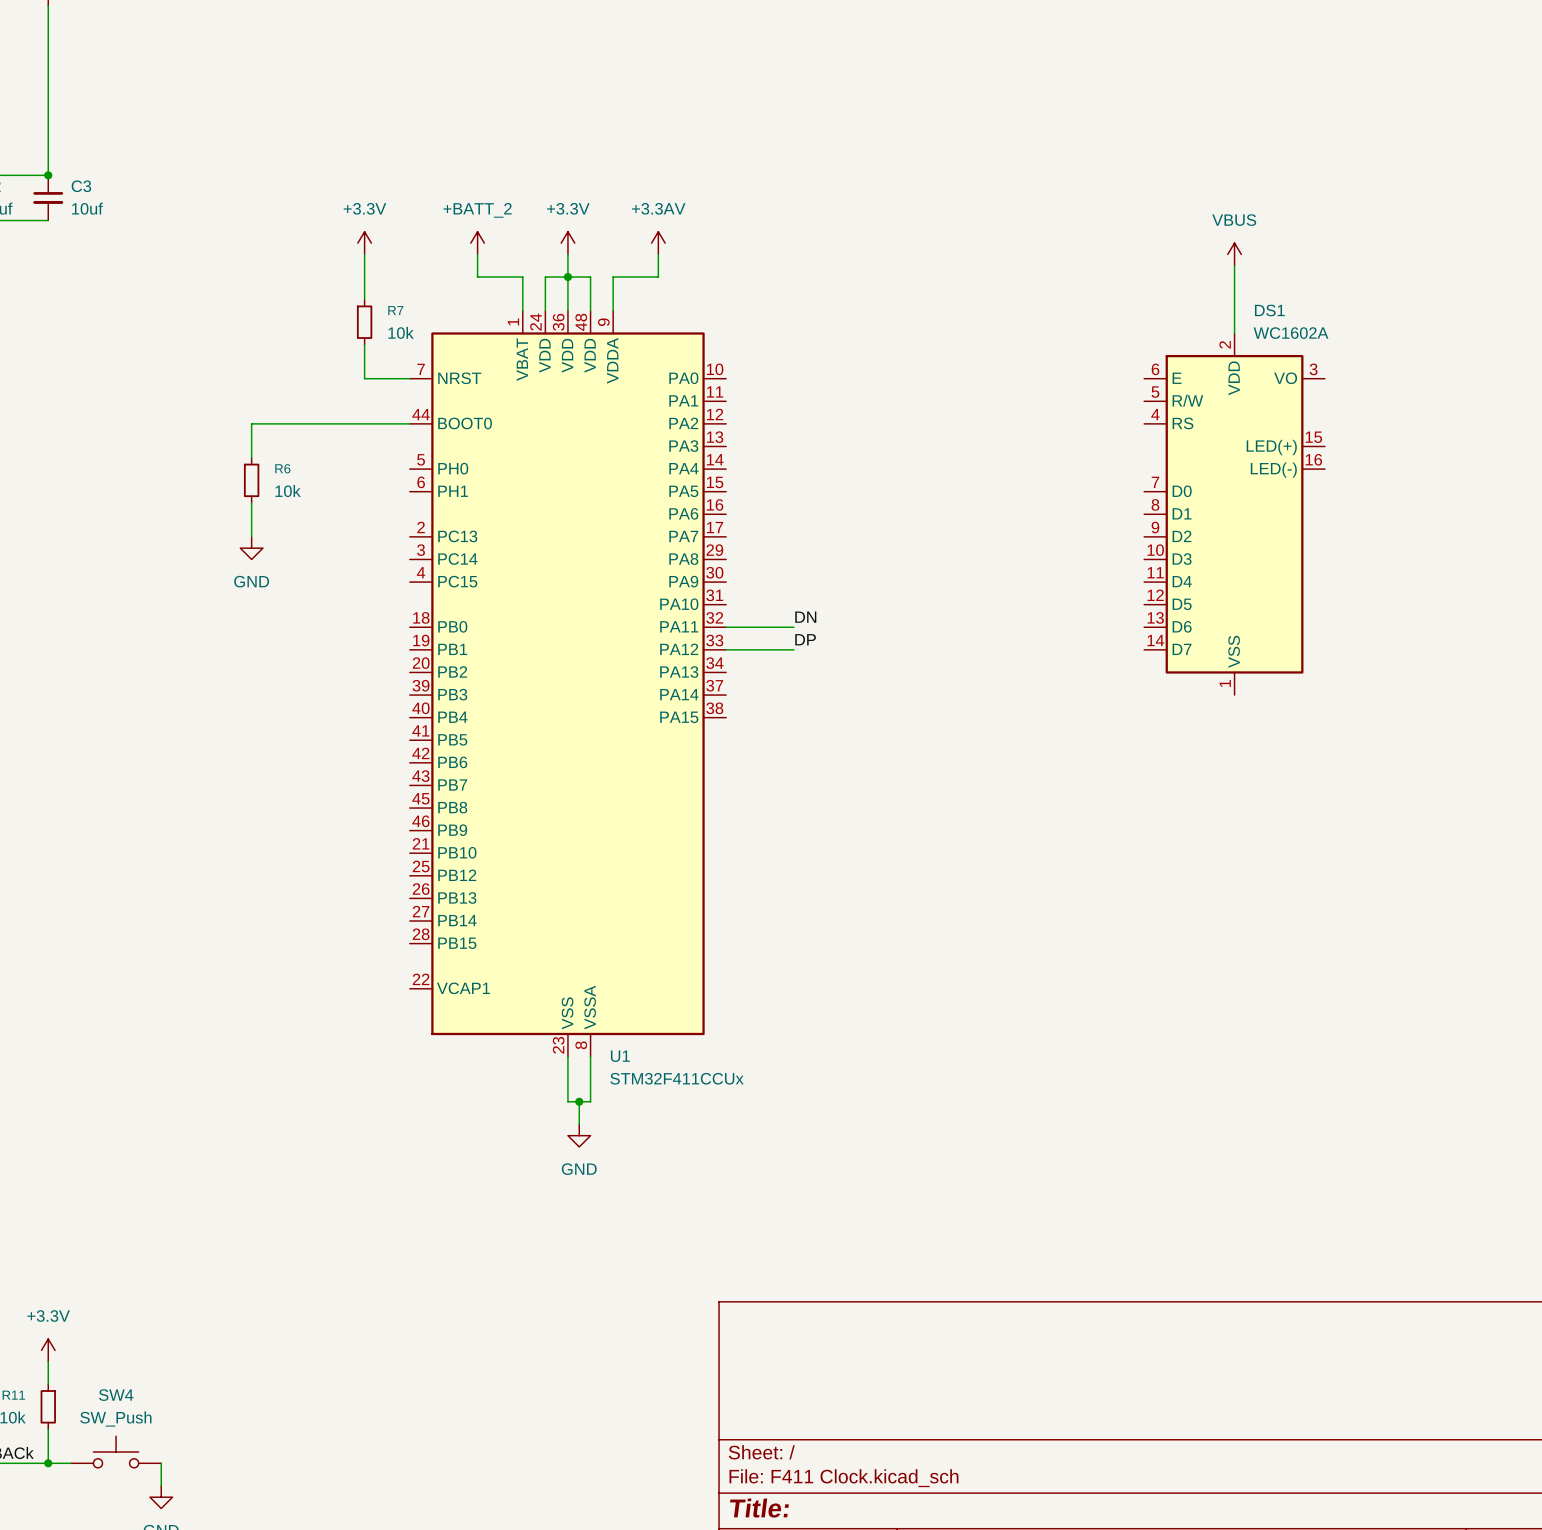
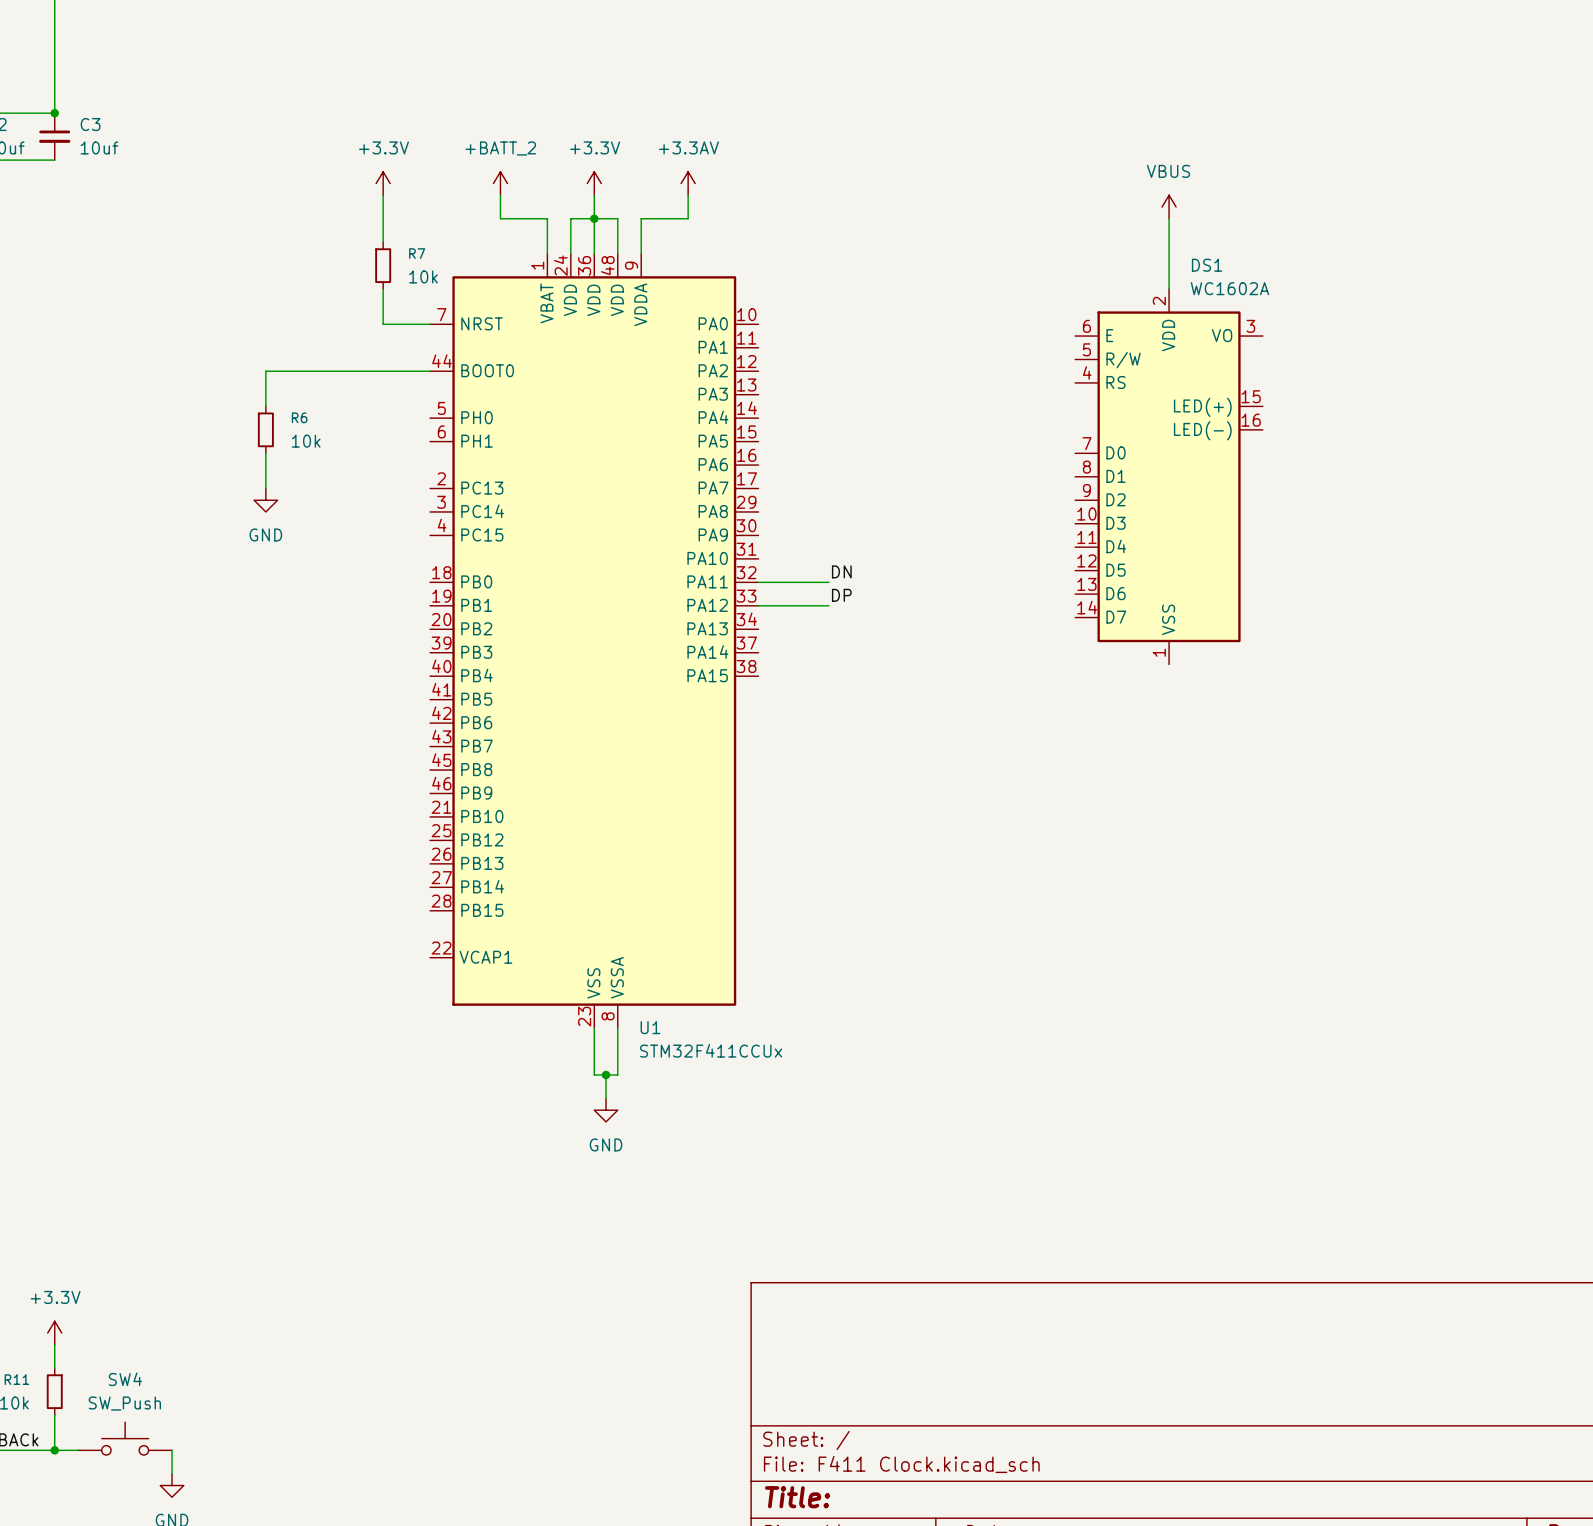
power symbol position: VBUS (1234, 254) -> VBUS (1169, 207)
wire: (1234, 265) (1234, 333) -> (1169, 218) (1169, 289)
DS1 position: (1234, 514) -> (1169, 476)

